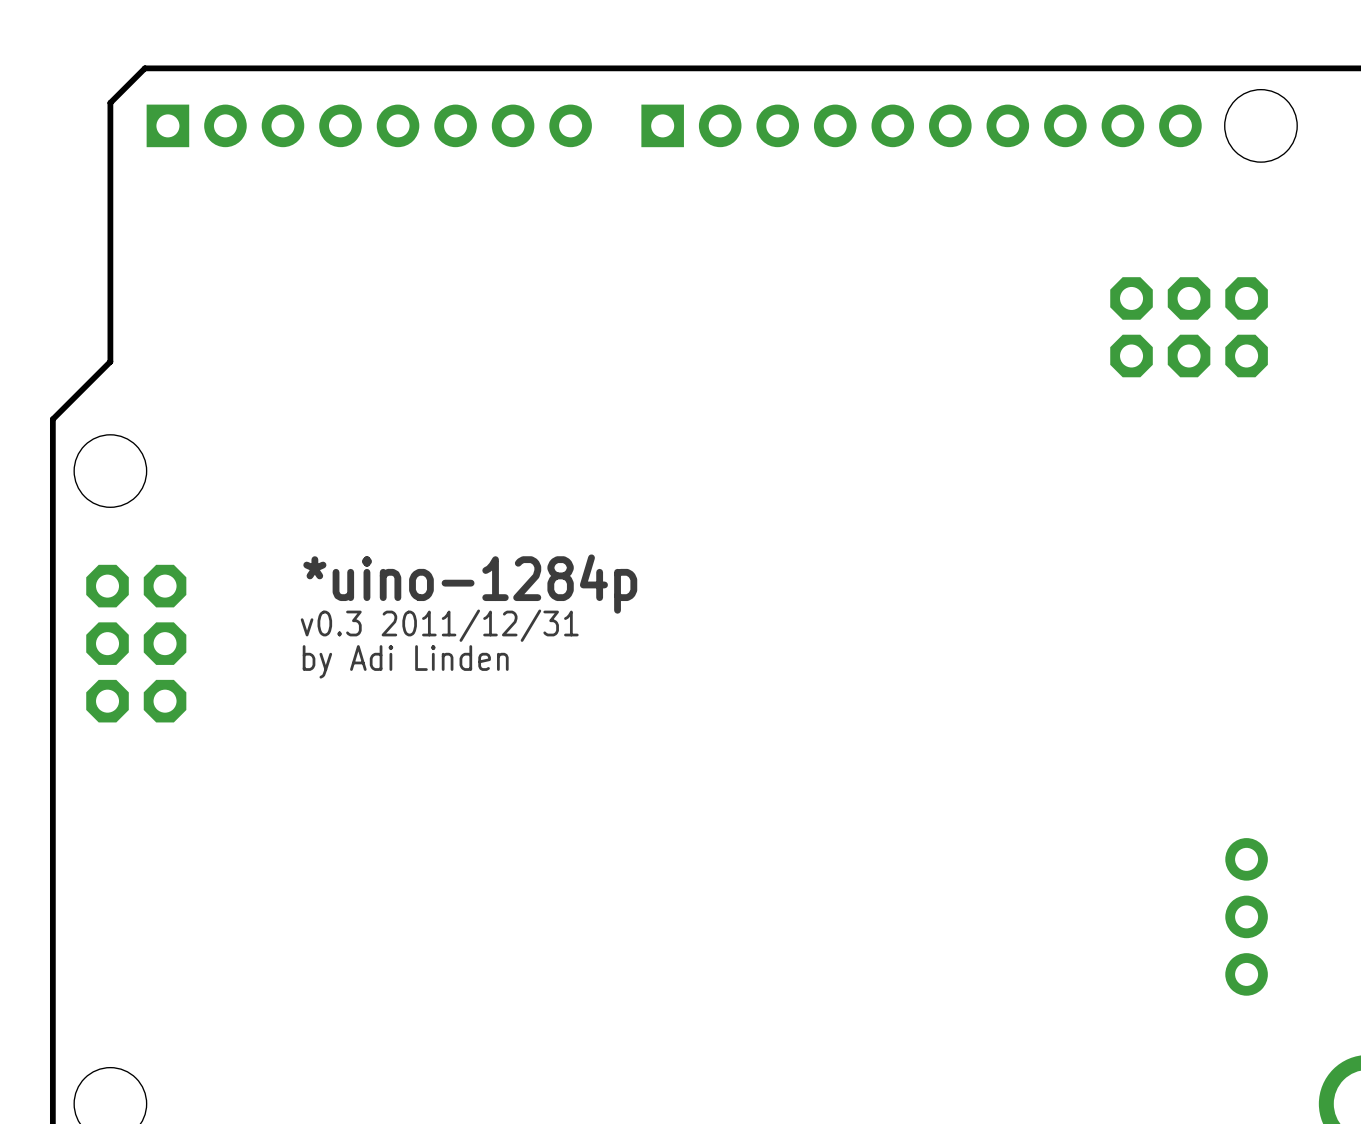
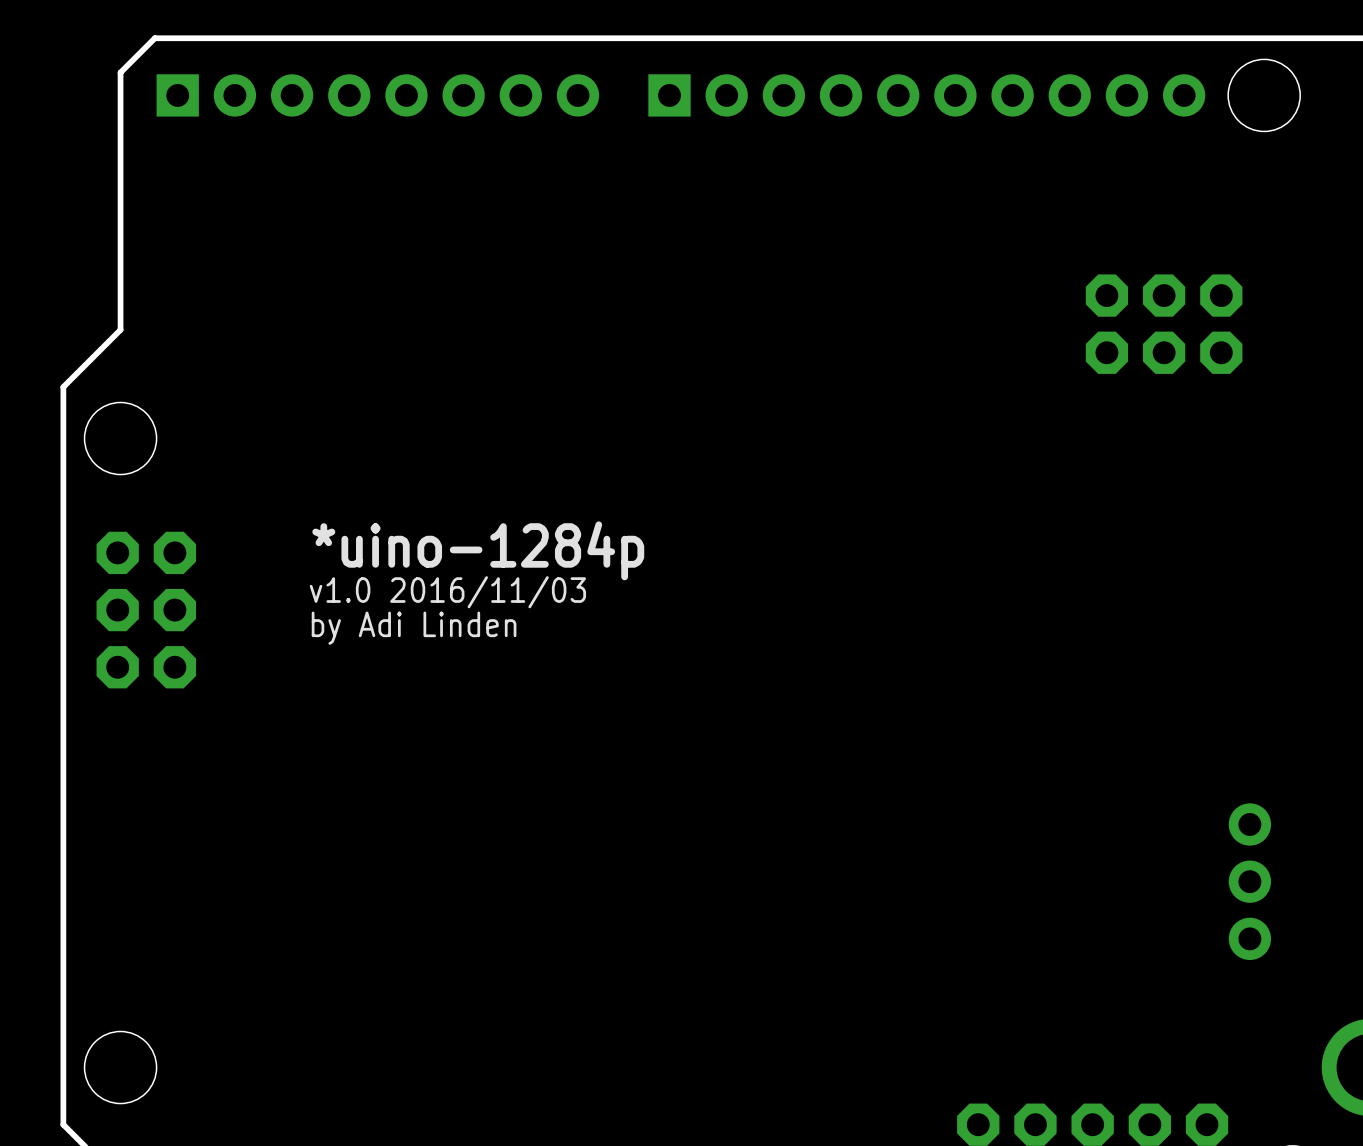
part position: (1189, 327) -> (1164, 324)
text: v0.3 2011/12/31 (439, 625) -> v1.0 2016/11/03 (447, 592)

